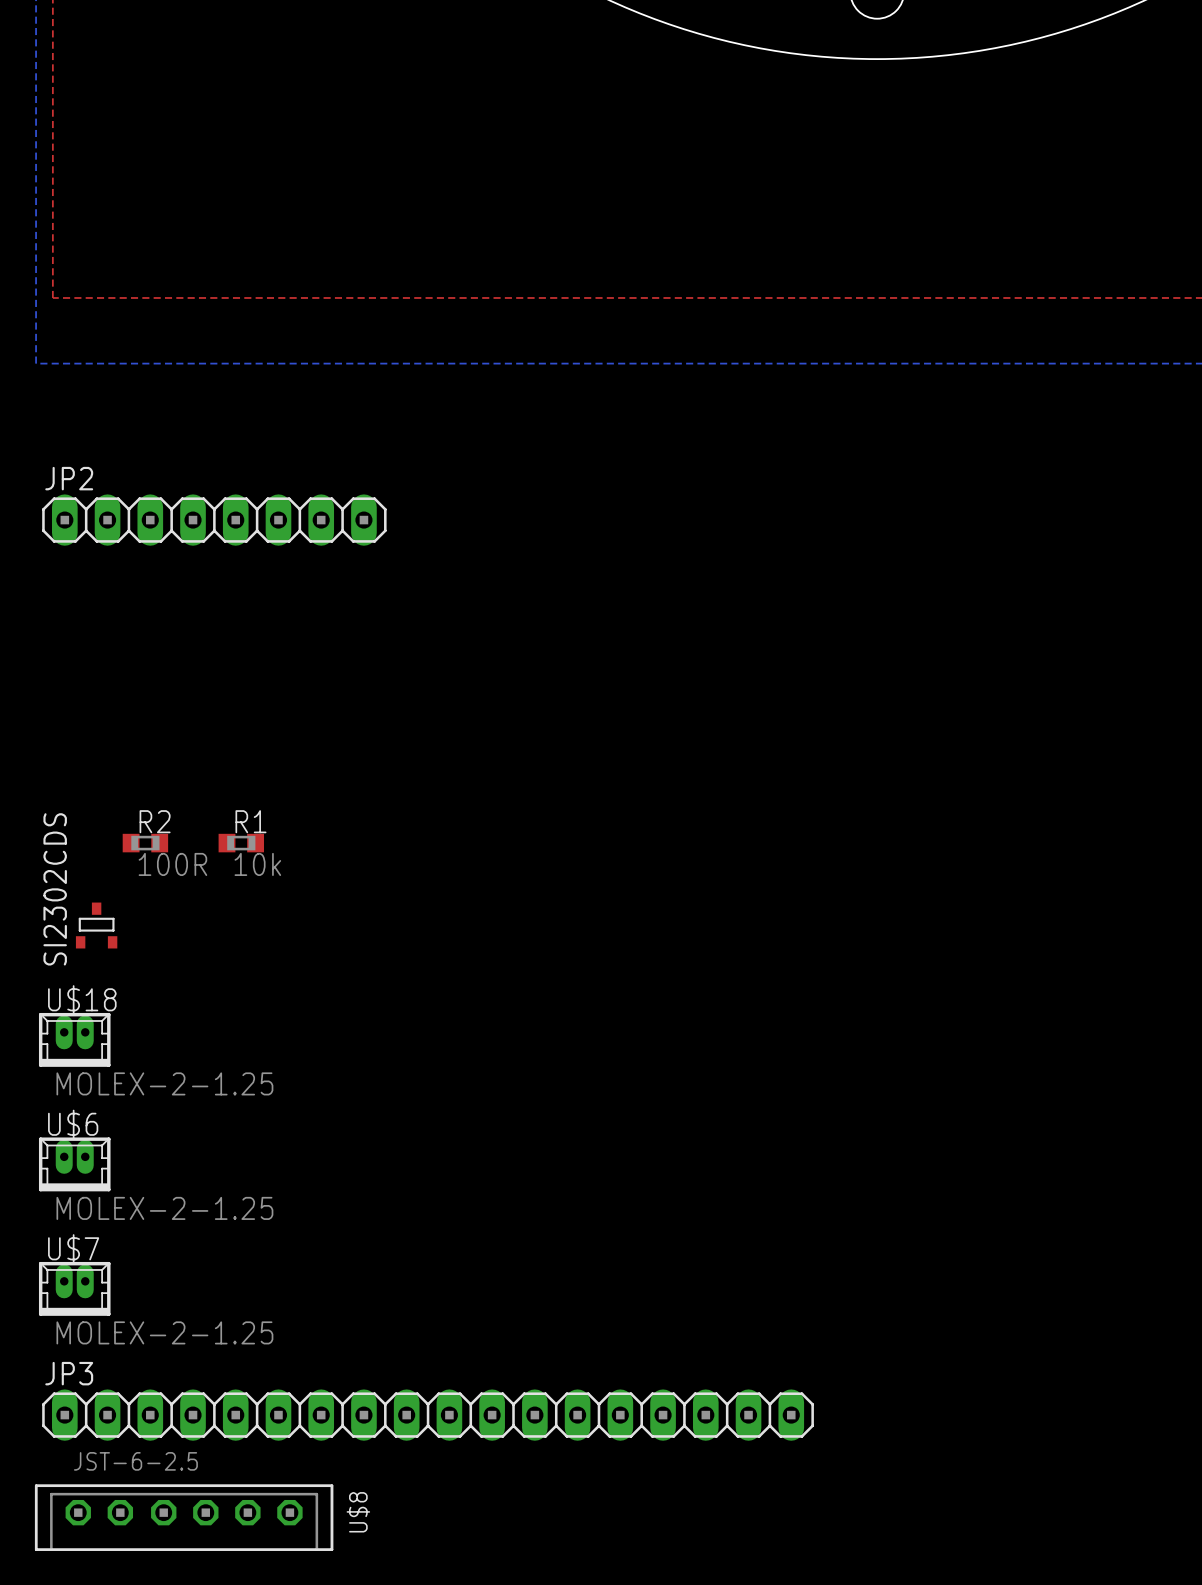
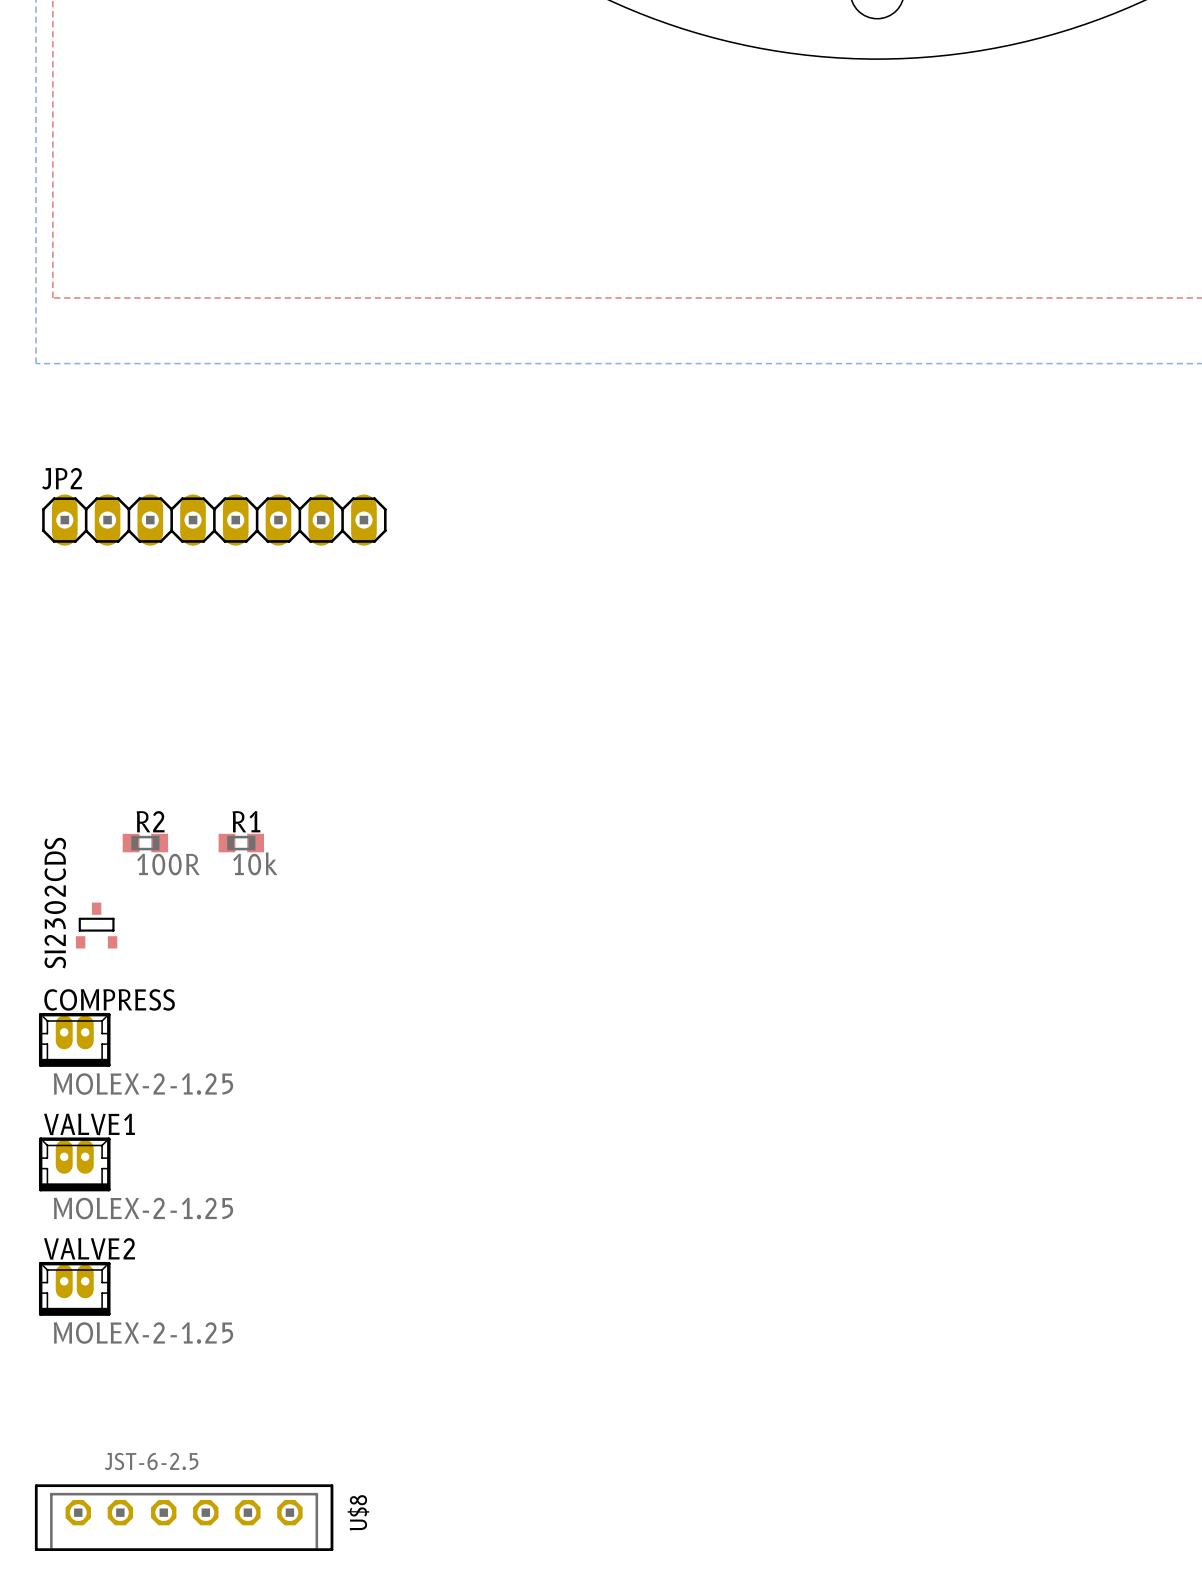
U$18 name: U$18 (82, 999) -> COMPRESS (109, 999)
U$6 name: U$6 (73, 1124) -> VALVE1 (89, 1124)
U$7 name: U$7 (73, 1248) -> VALVE2 (89, 1248)
JP3: (428, 1415) -> none

